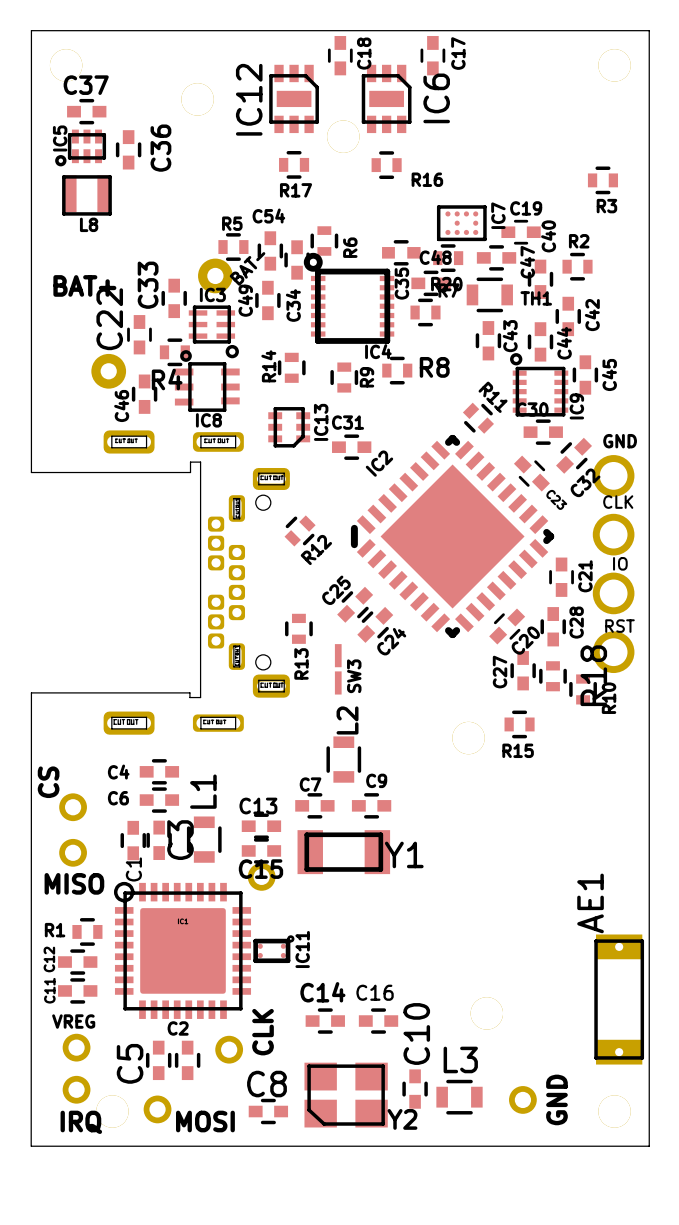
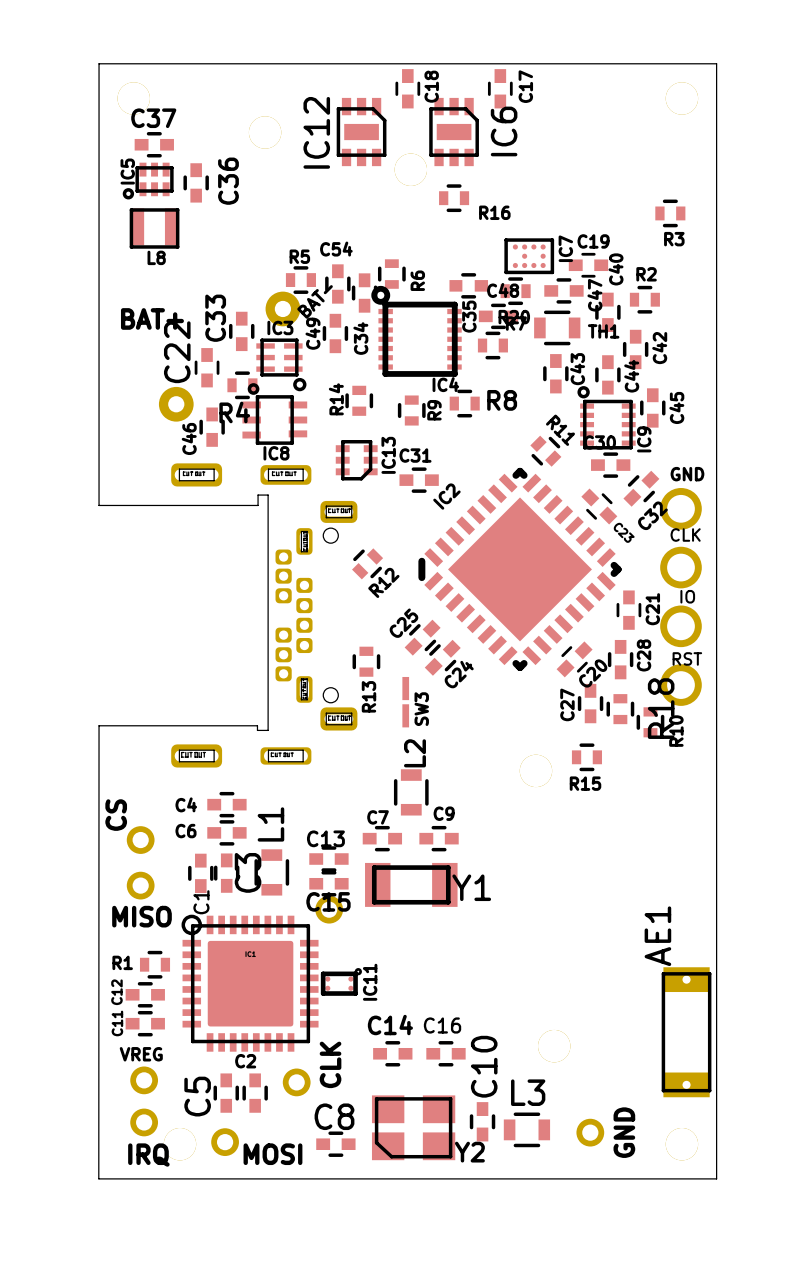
R17: (294, 164) -> none

